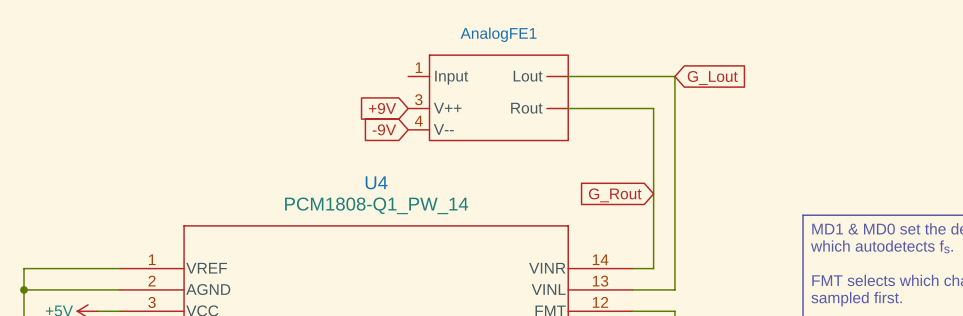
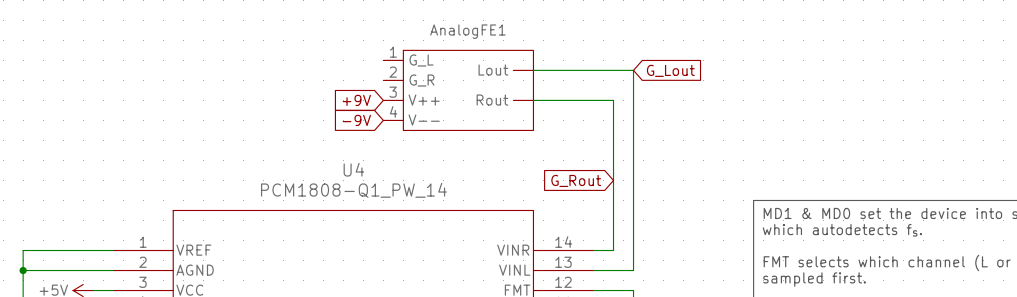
AnalogFE1 symbol: [408, 55, 569, 141] -> [383, 50, 534, 131]

